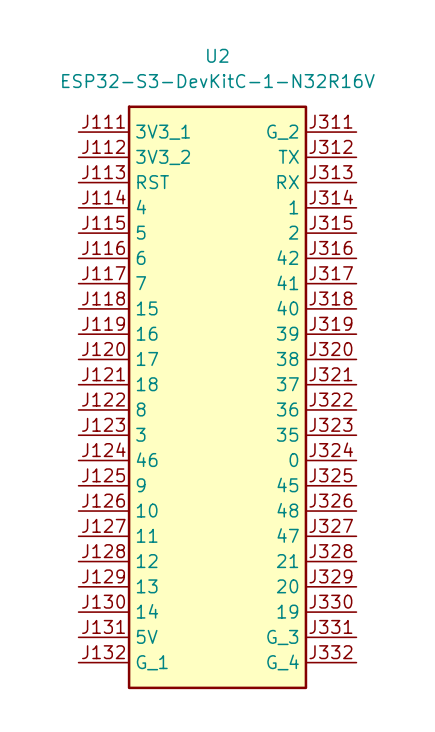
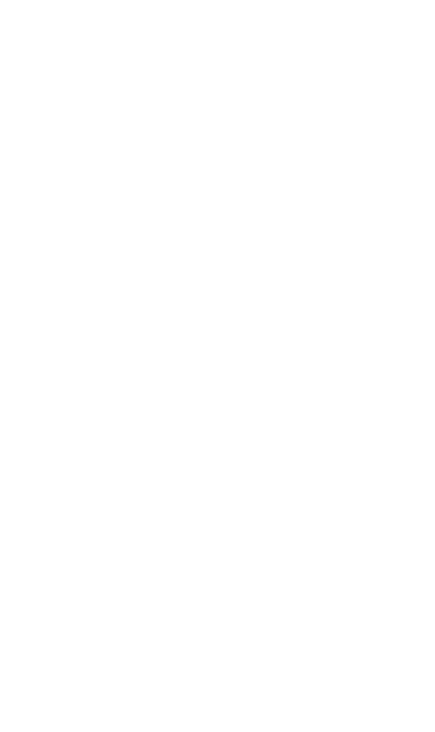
U2: ESP32-S3-DevKitC-1-N32R16V (217, 397) -> none

